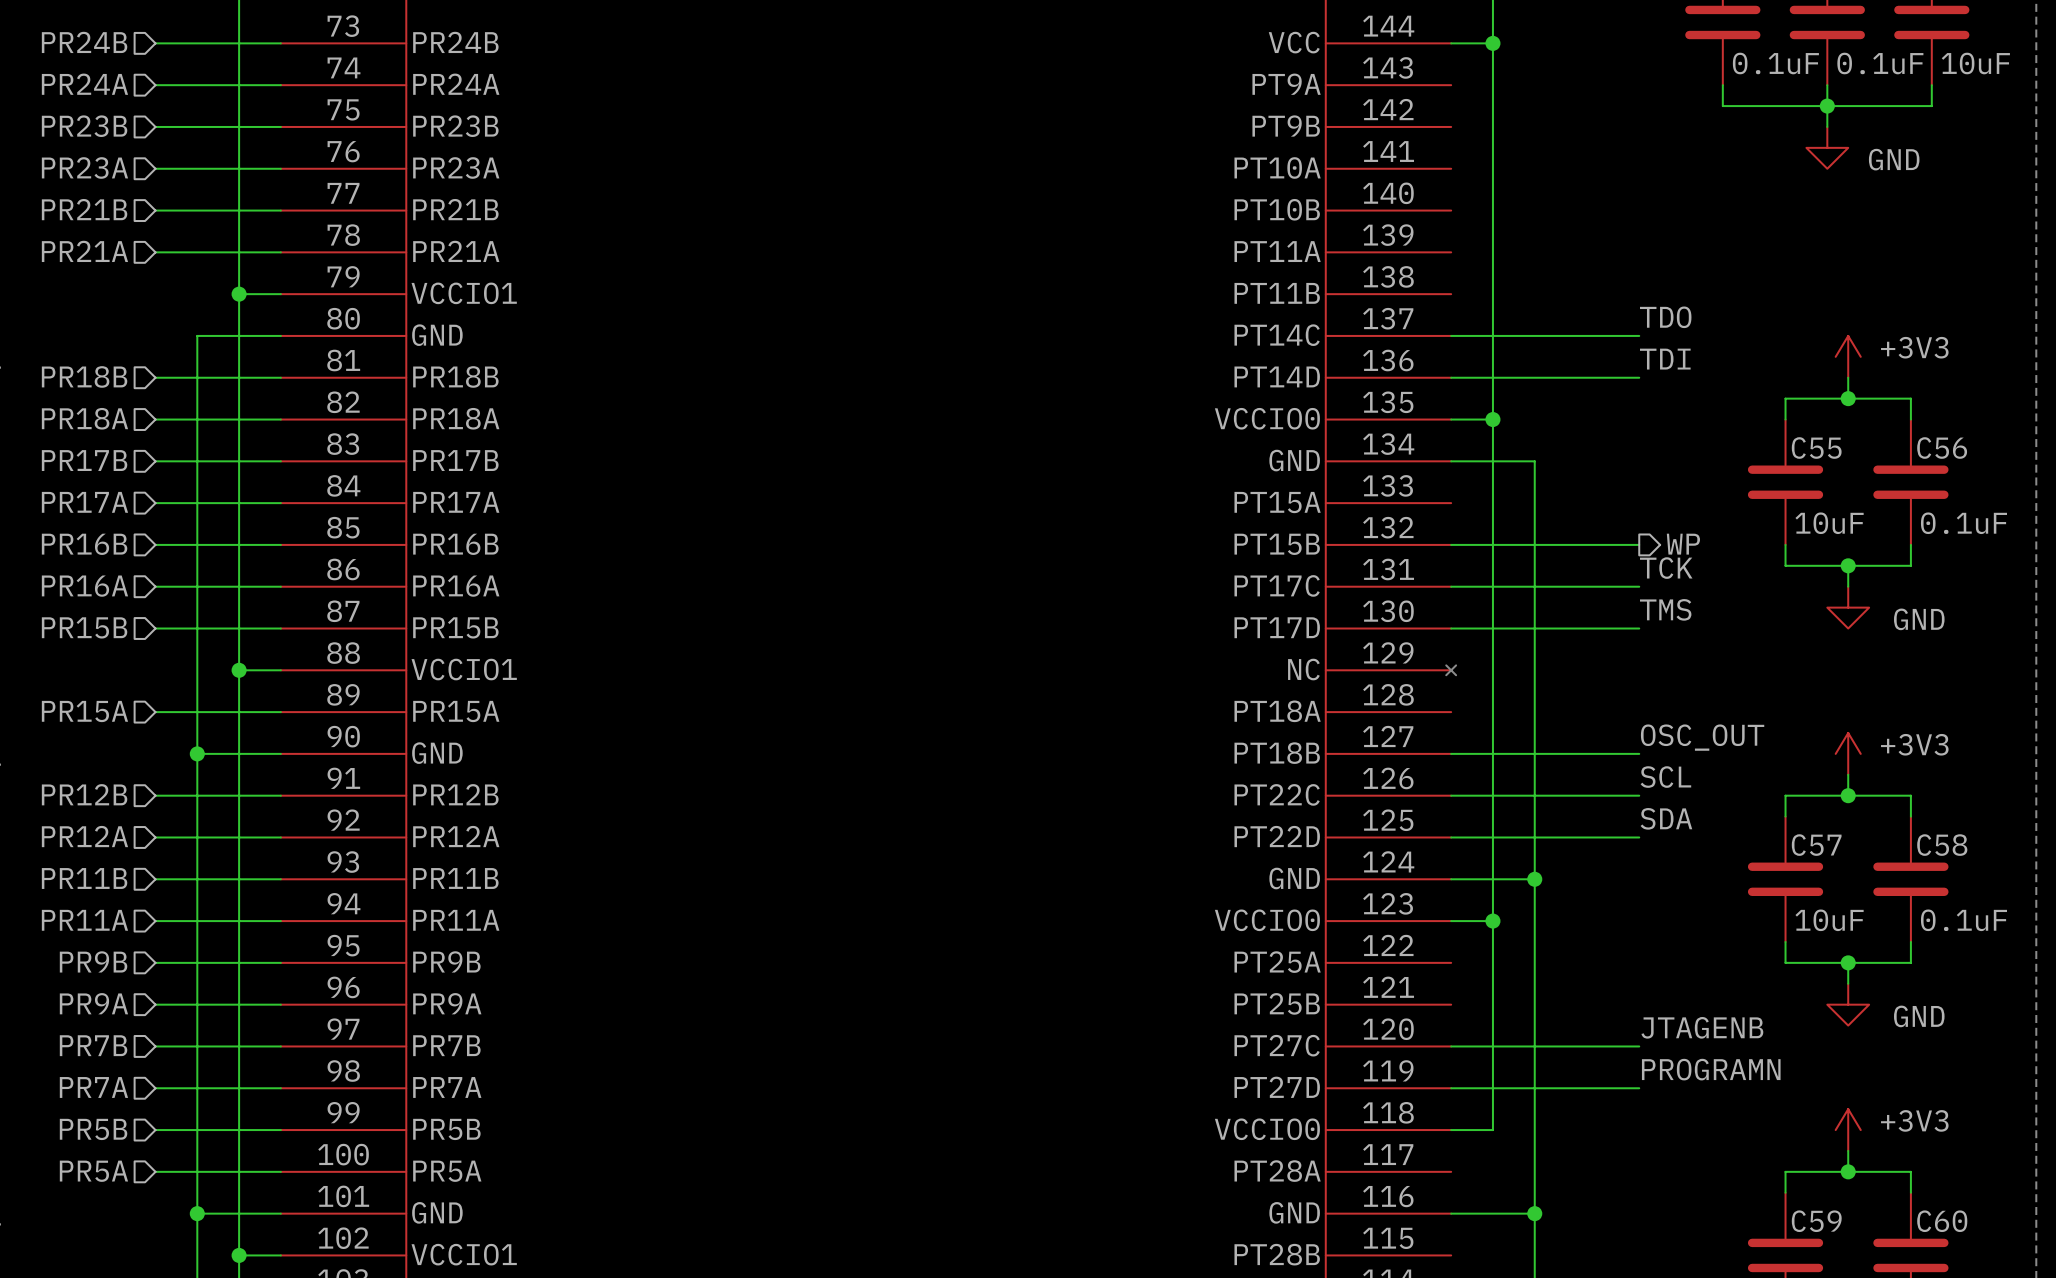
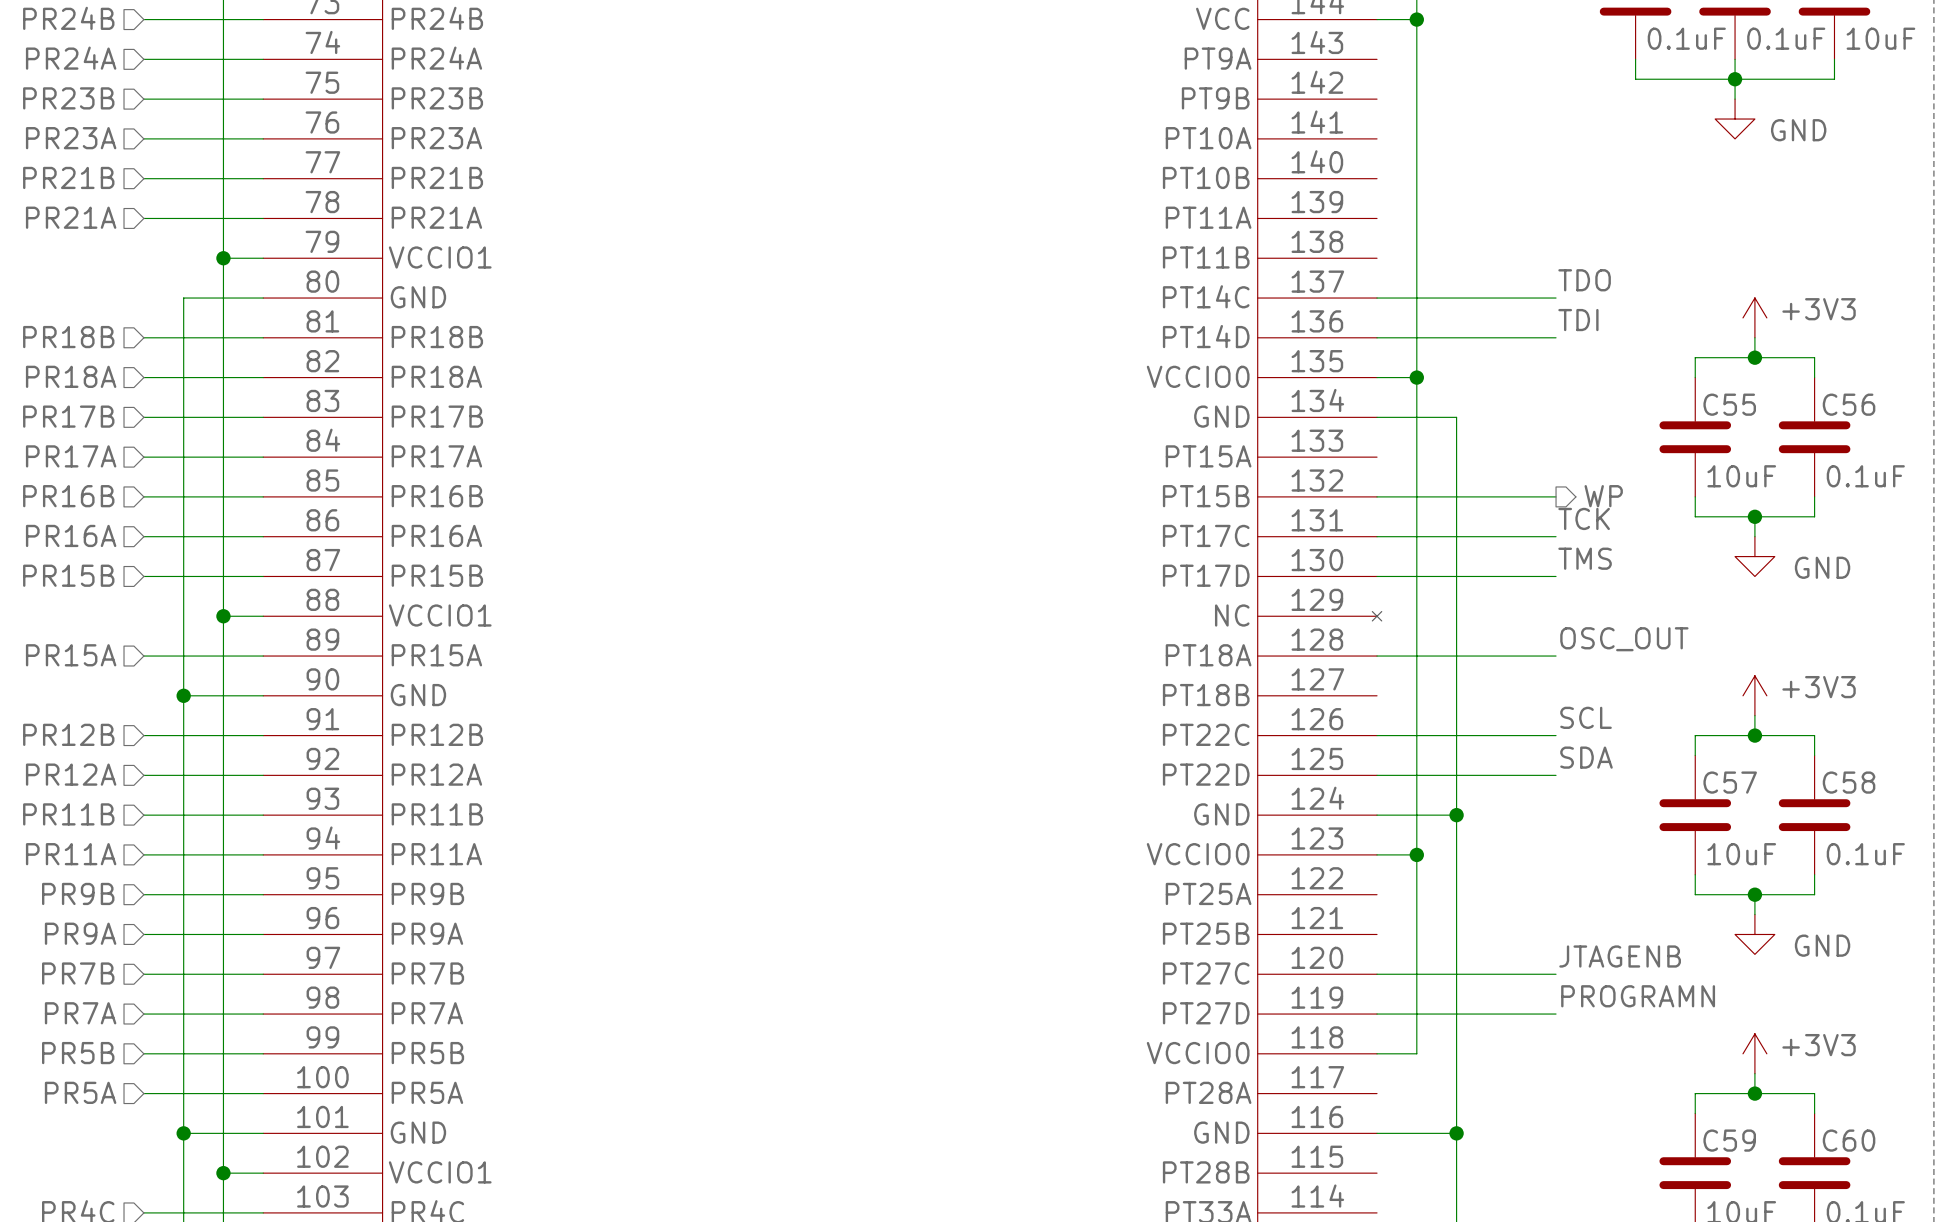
label position: OSC_OUT (1702, 737) -> OSC_OUT (1624, 639)
wire: (1451, 753) (1639, 753) -> (1377, 656) (1556, 656)

